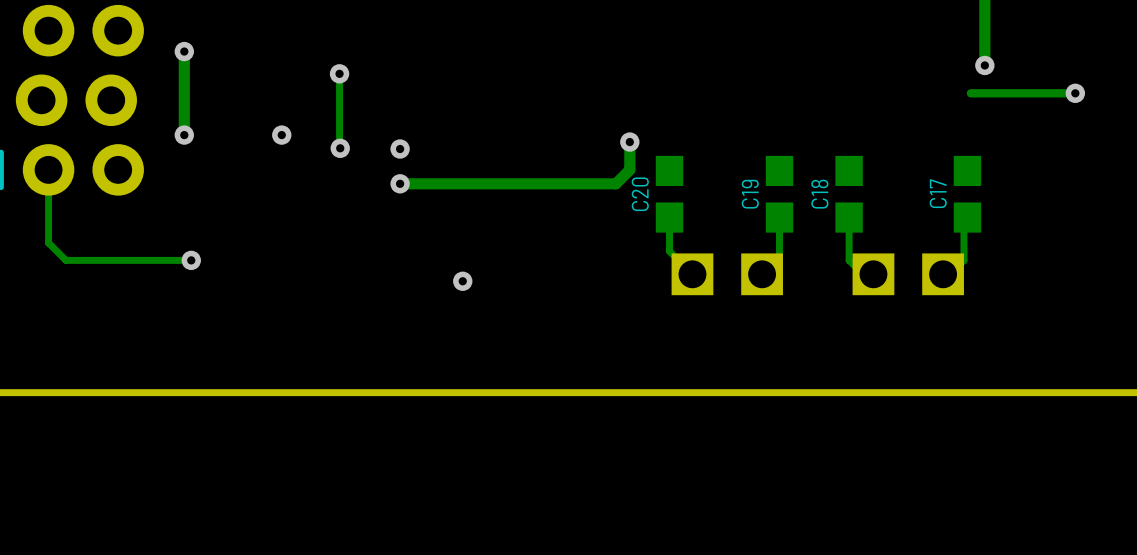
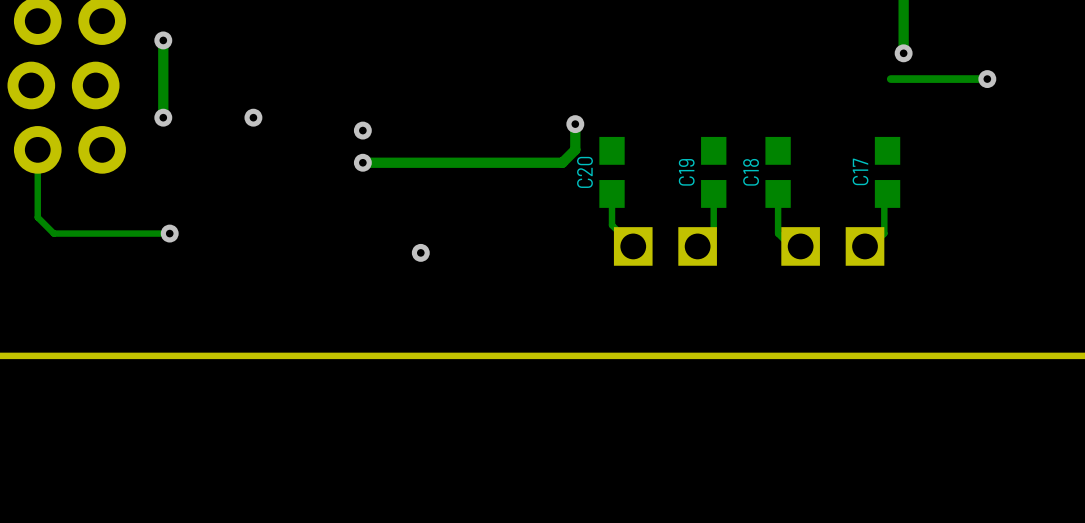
track: (339, 73) (340, 148) -> none
via: (339, 73) -> none
via: (340, 148) -> none

